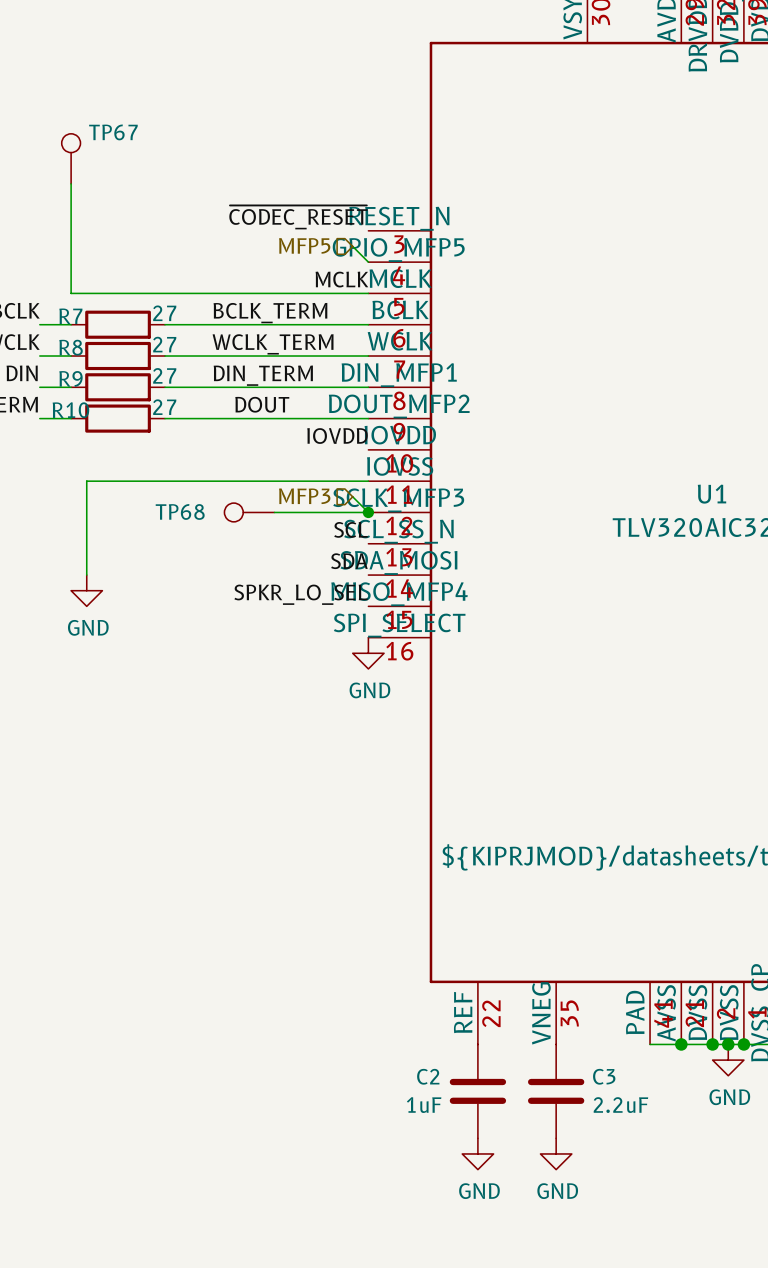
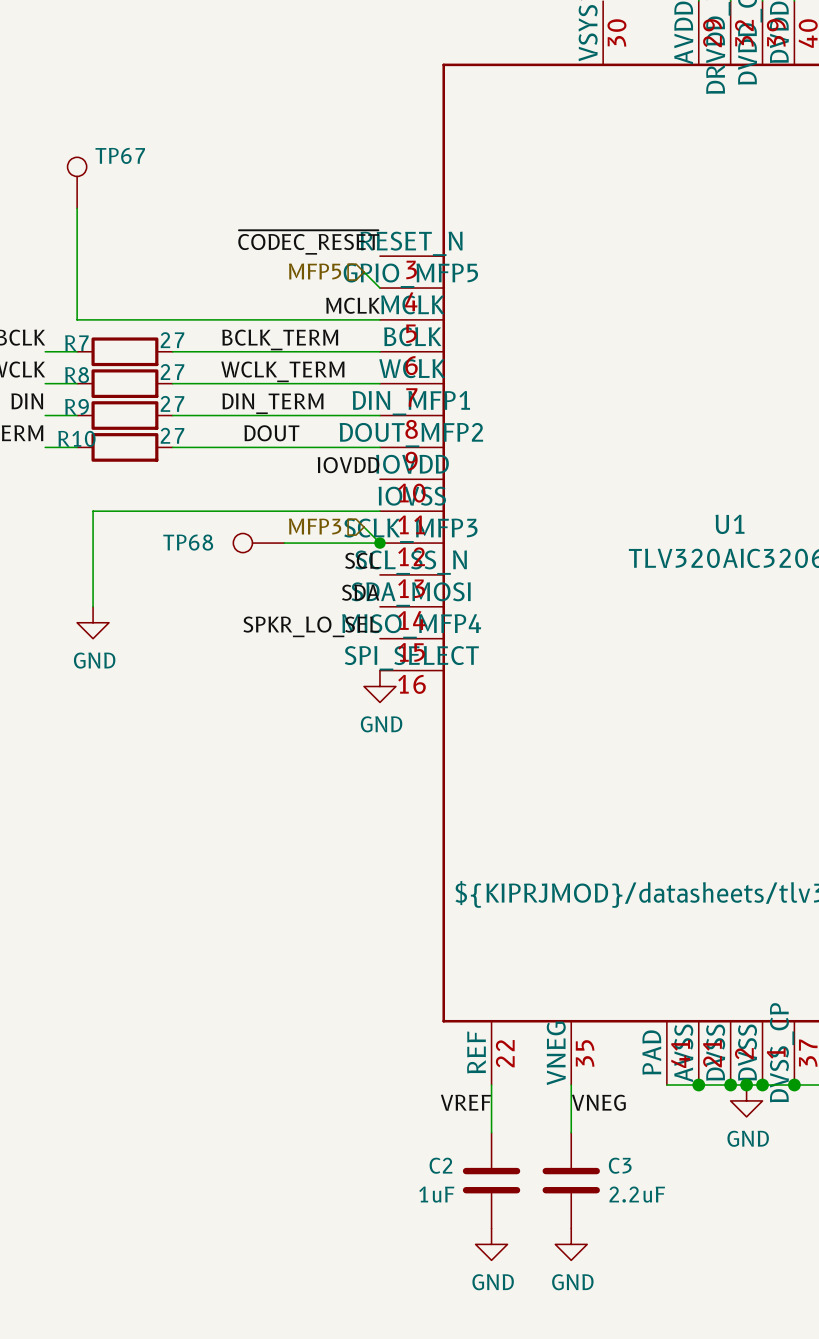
label: none -> VREF (465, 1102)
label: none -> VNEG (598, 1102)
C2 position: (477, 1091) -> (491, 1180)
C3 position: (556, 1091) -> (571, 1180)
power symbol: GND (477, 1153) -> none
power symbol: GND (556, 1153) -> none
power symbol: none -> GND (491, 1244)
power symbol: none -> GND (571, 1244)

